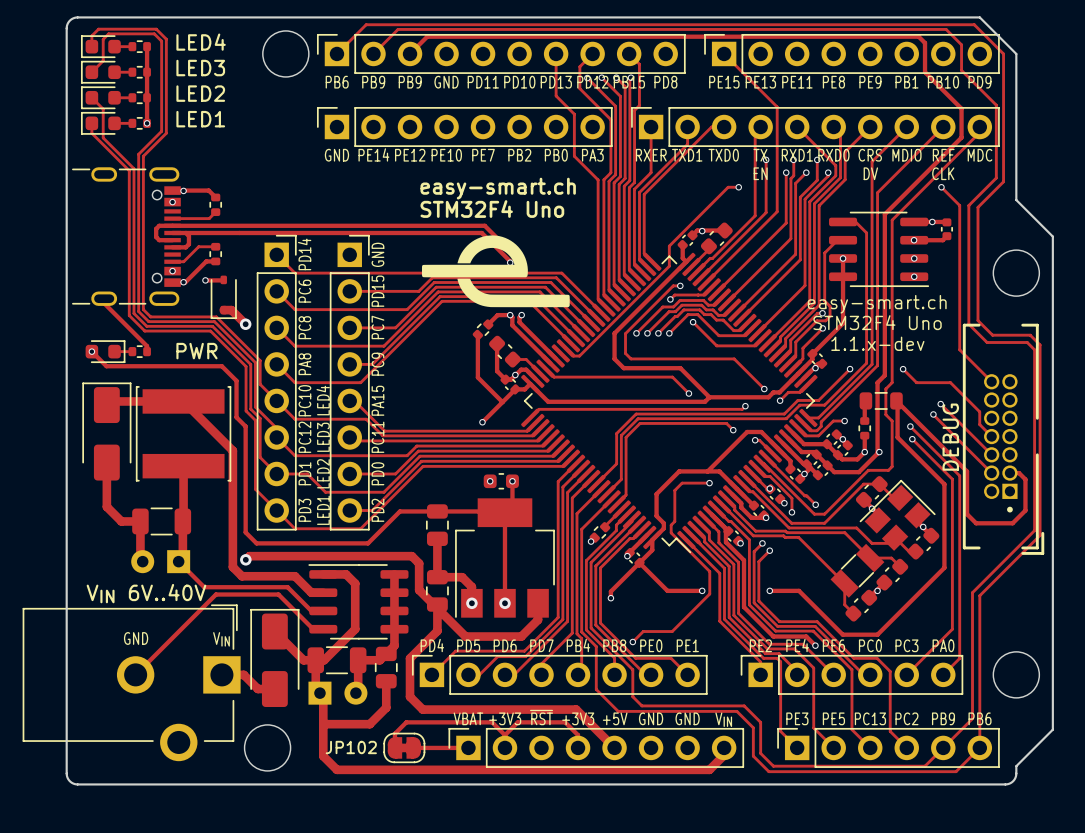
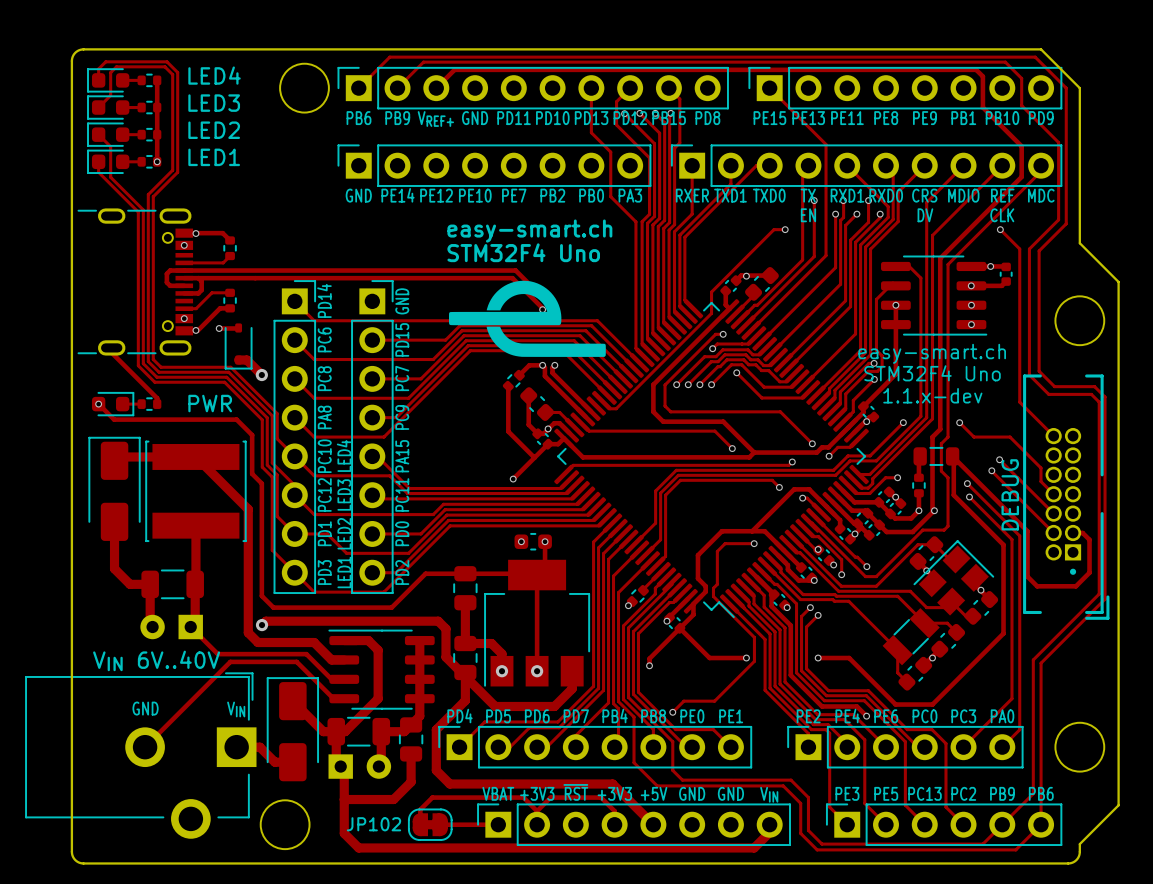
text: PB9 (410, 82) -> VREF+ (435, 119)

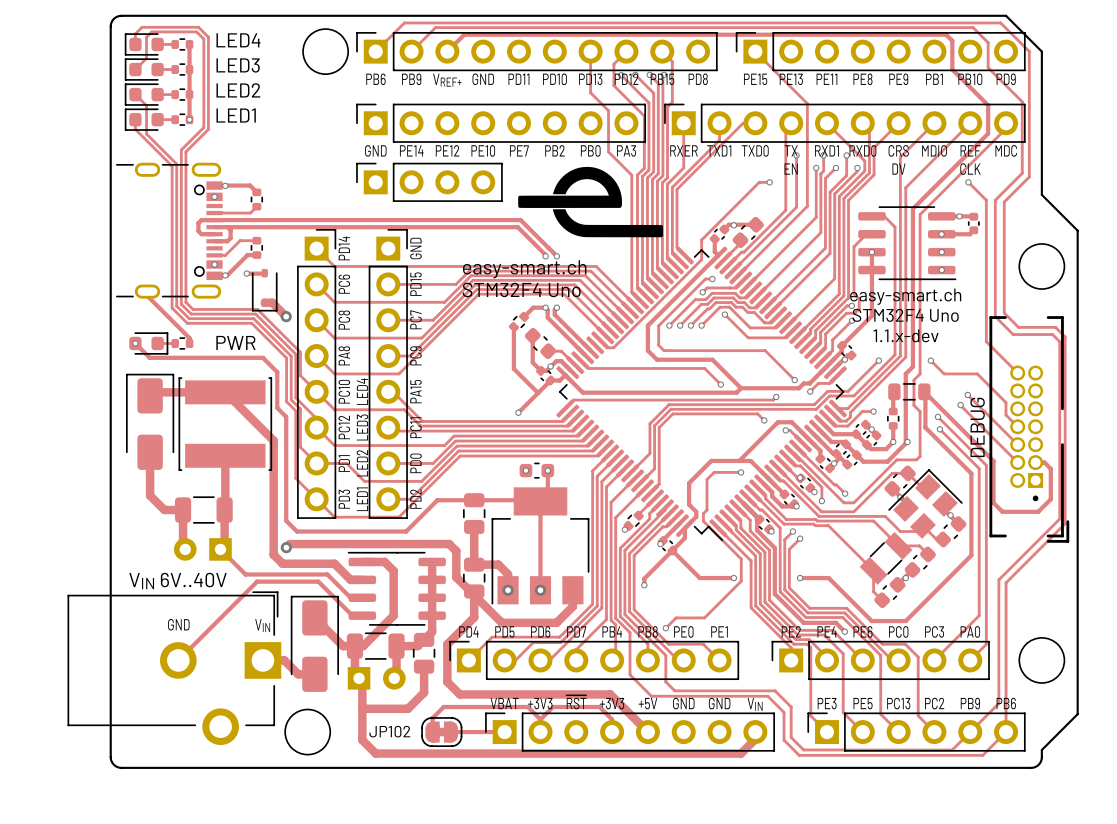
part: none -> (429, 182)
text position: easy-smart.ch (529, 231) -> easy-smart.ch (524, 269)
text position: STM32F4 Uno (523, 252) -> STM32F4 Uno (521, 289)
drawing position: (527, 318) -> (590, 202)

